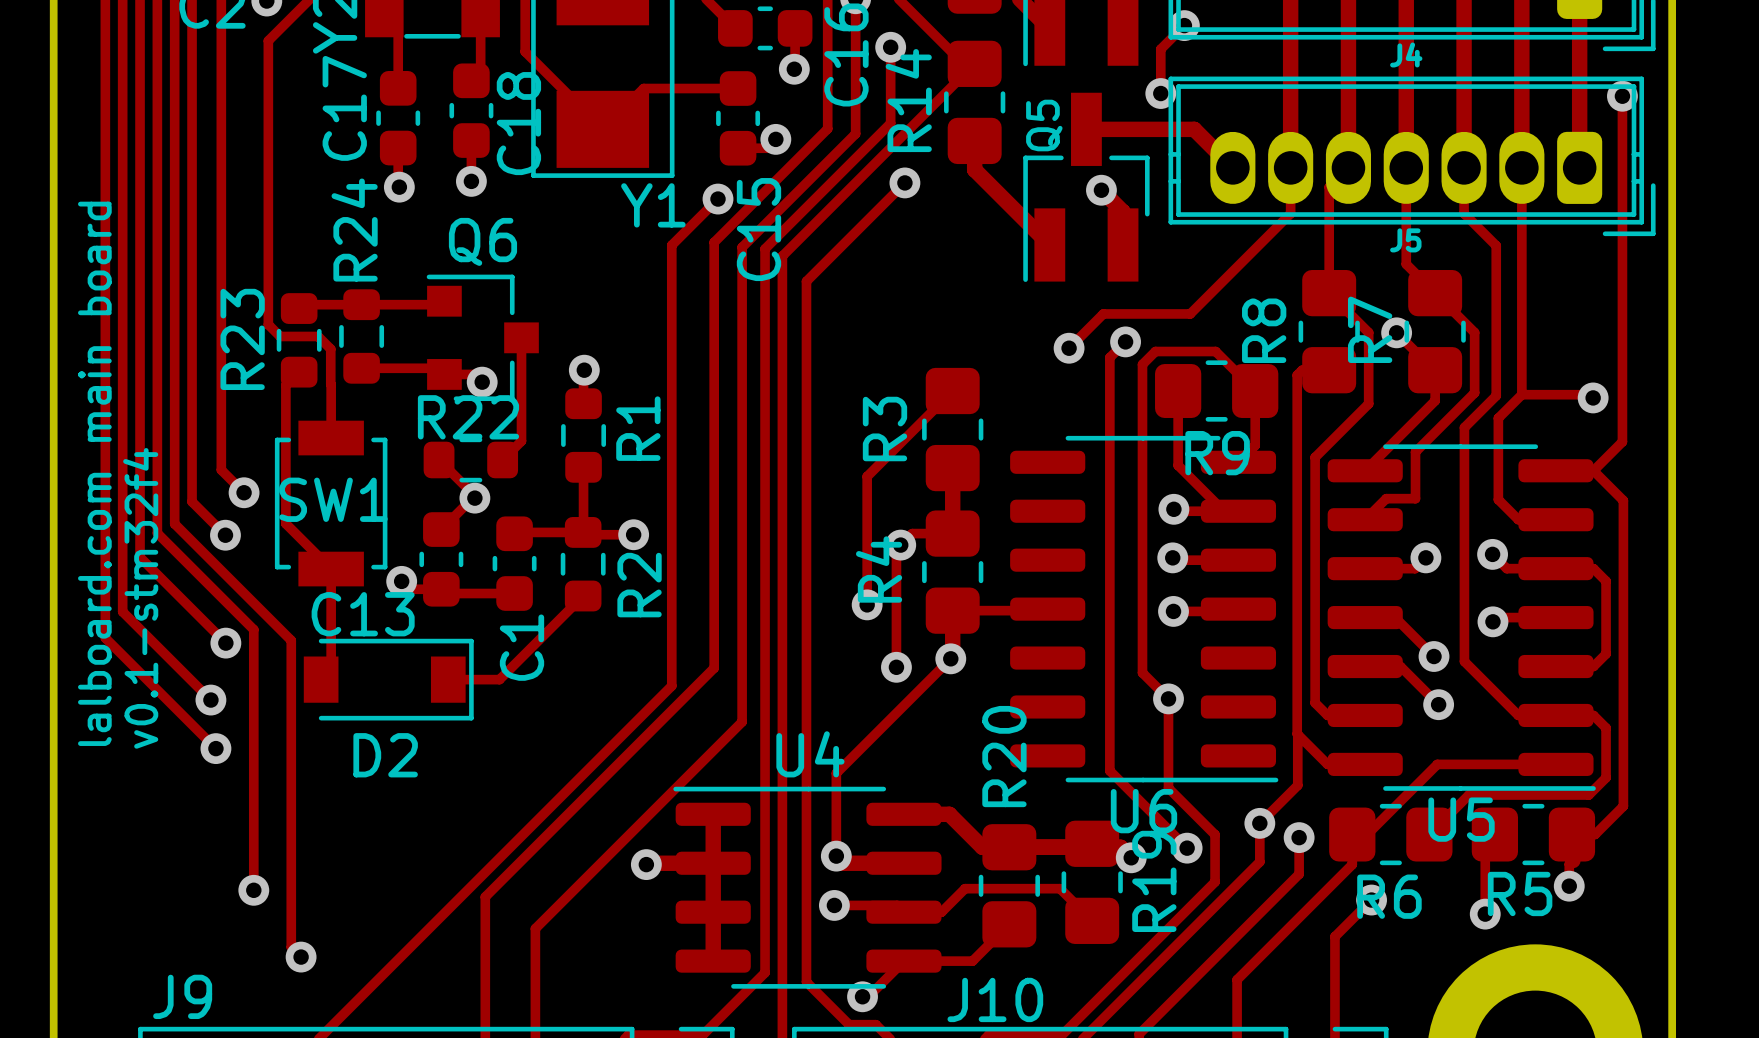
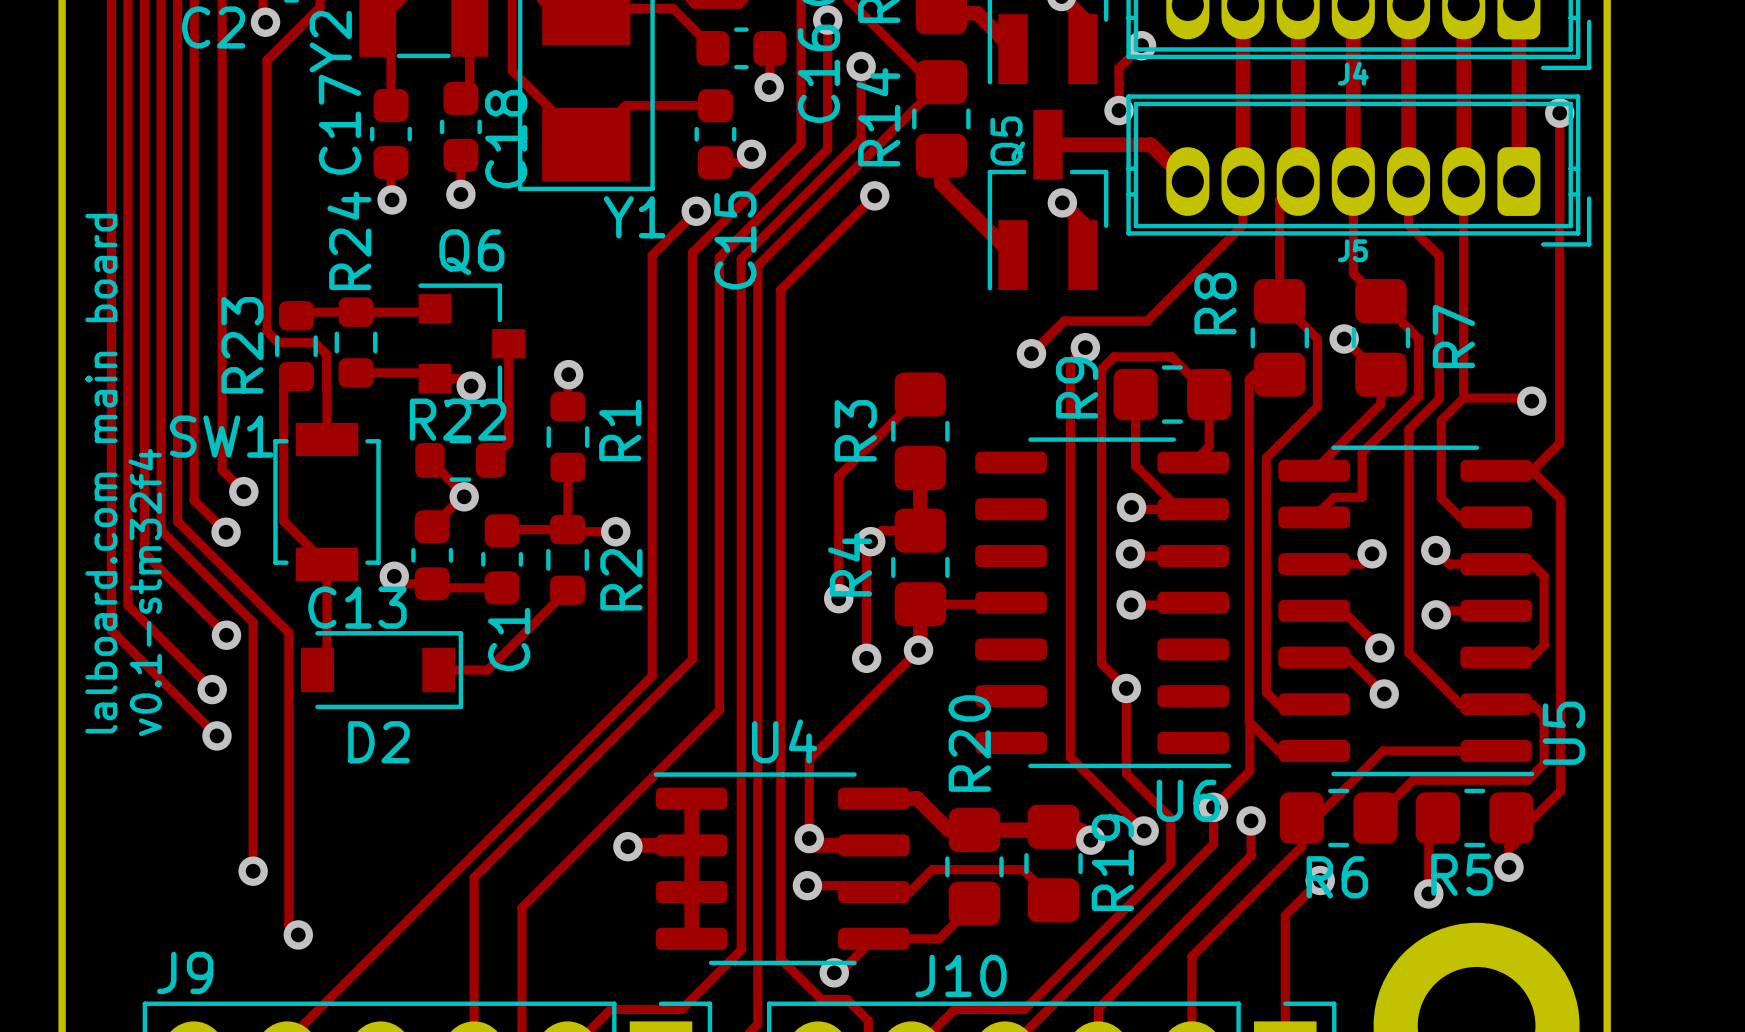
R7 name position: R7 (1370, 329) -> R7 (1453, 336)
R8 name position: R8 (1264, 330) -> R8 (1215, 303)
R9 name rotation: 0° (1217, 453) -> 90° counterclockwise (1077, 387)
R9 name position: R9 (1217, 453) -> R9 (1077, 387)
SW1 name position: SW1 (333, 499) -> SW1 (221, 436)
U6 name position: U6 (1143, 811) -> U6 (1188, 800)
U5 name rotation: 0° (1461, 819) -> 90° counterclockwise (1563, 733)
U5 name position: U5 (1461, 819) -> U5 (1563, 733)

